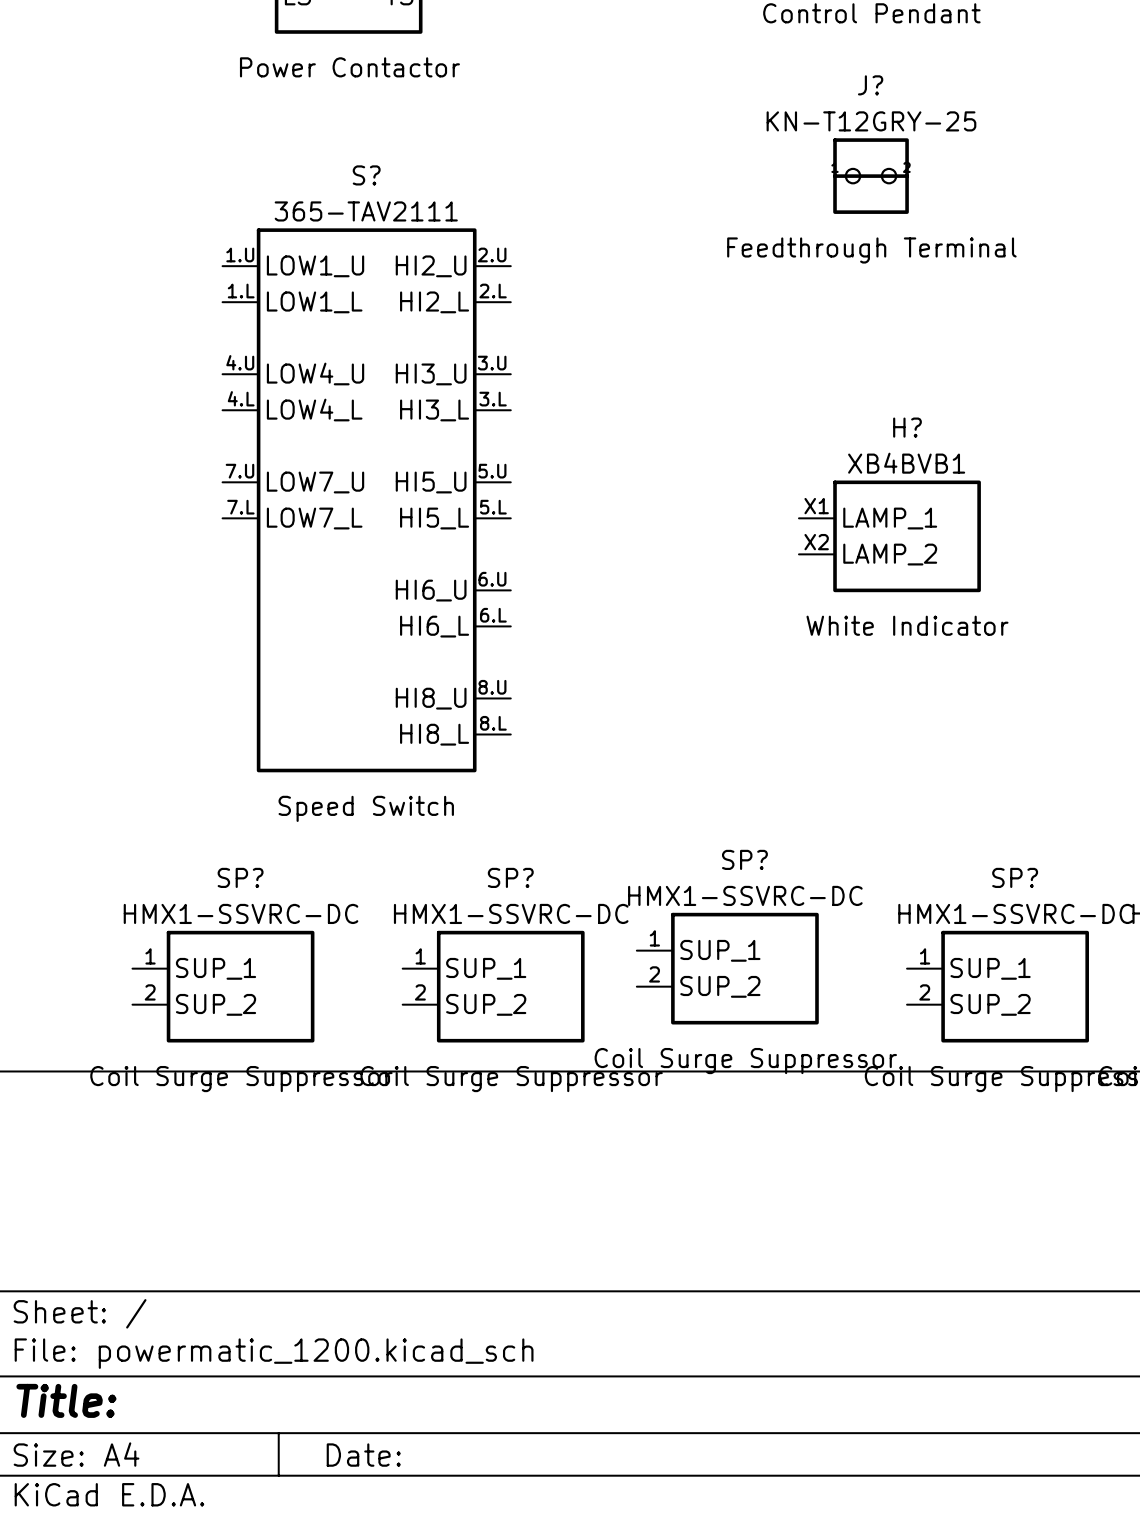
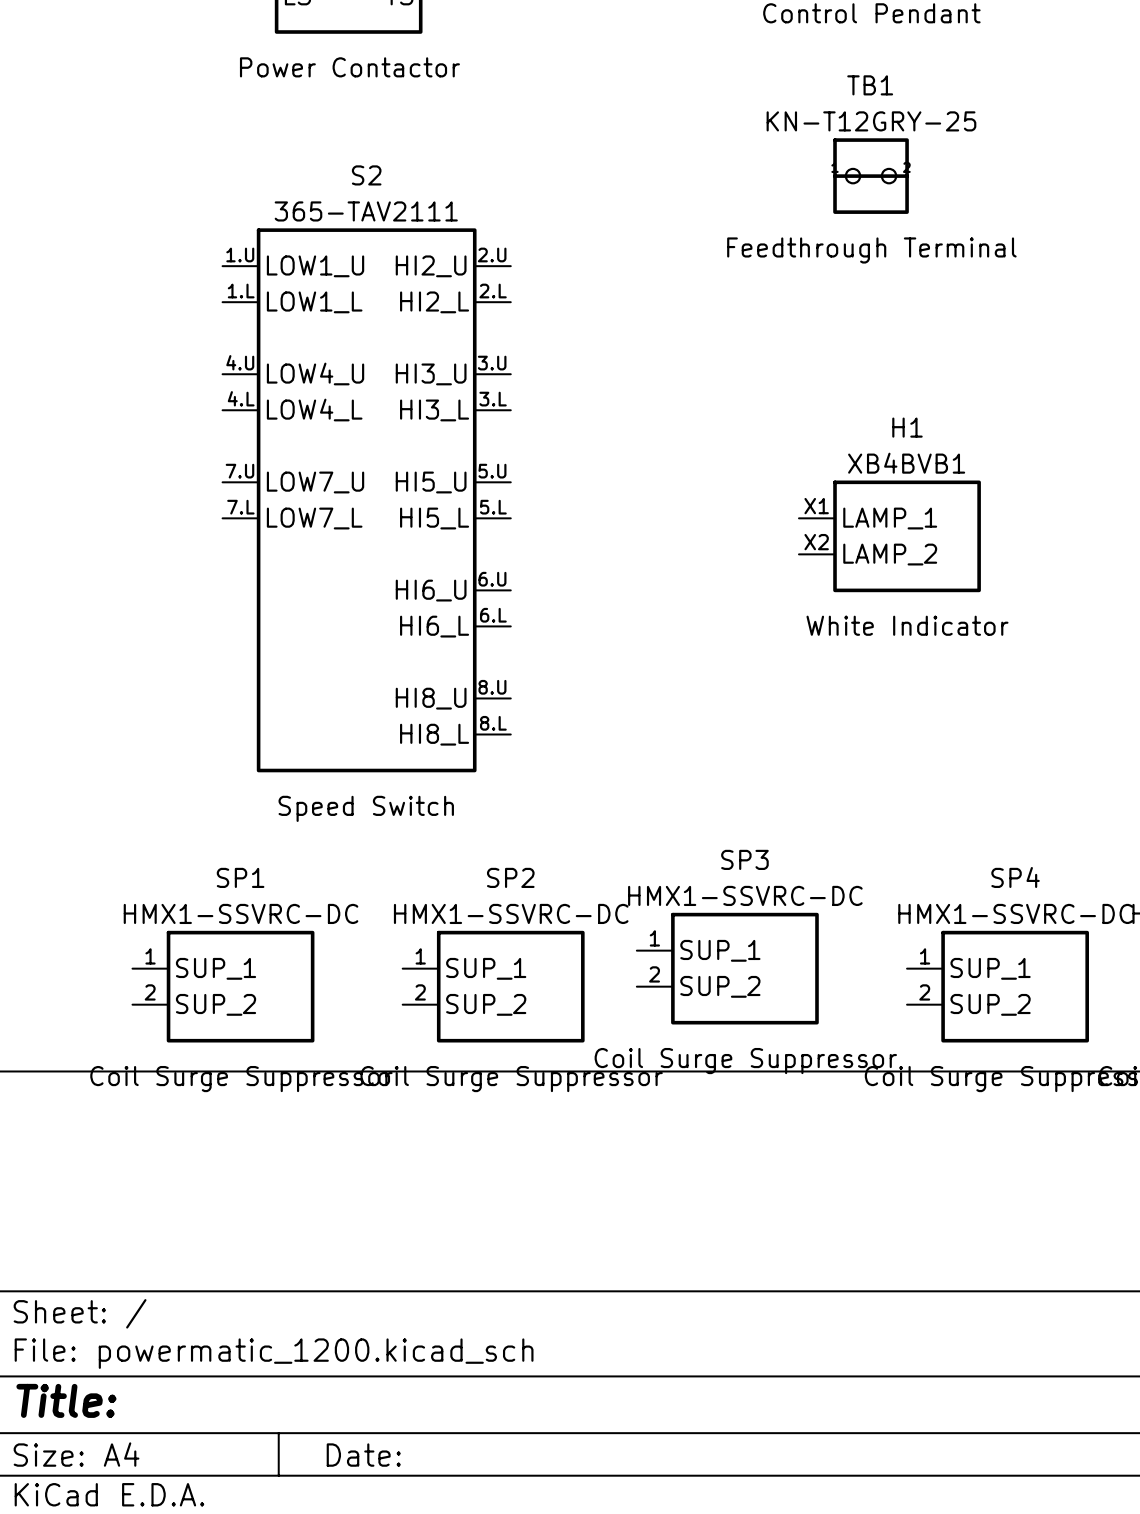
J? name: J? (870, 85) -> TB1 (870, 85)
S? name: S? (366, 175) -> S2 (366, 175)
H? name: H? (907, 427) -> H1 (907, 427)
SP? name: SP? (744, 859) -> SP3 (744, 859)
SP? name: SP? (240, 877) -> SP1 (240, 877)
SP? name: SP? (510, 877) -> SP2 (510, 877)
SP? name: SP? (1015, 877) -> SP4 (1015, 877)

